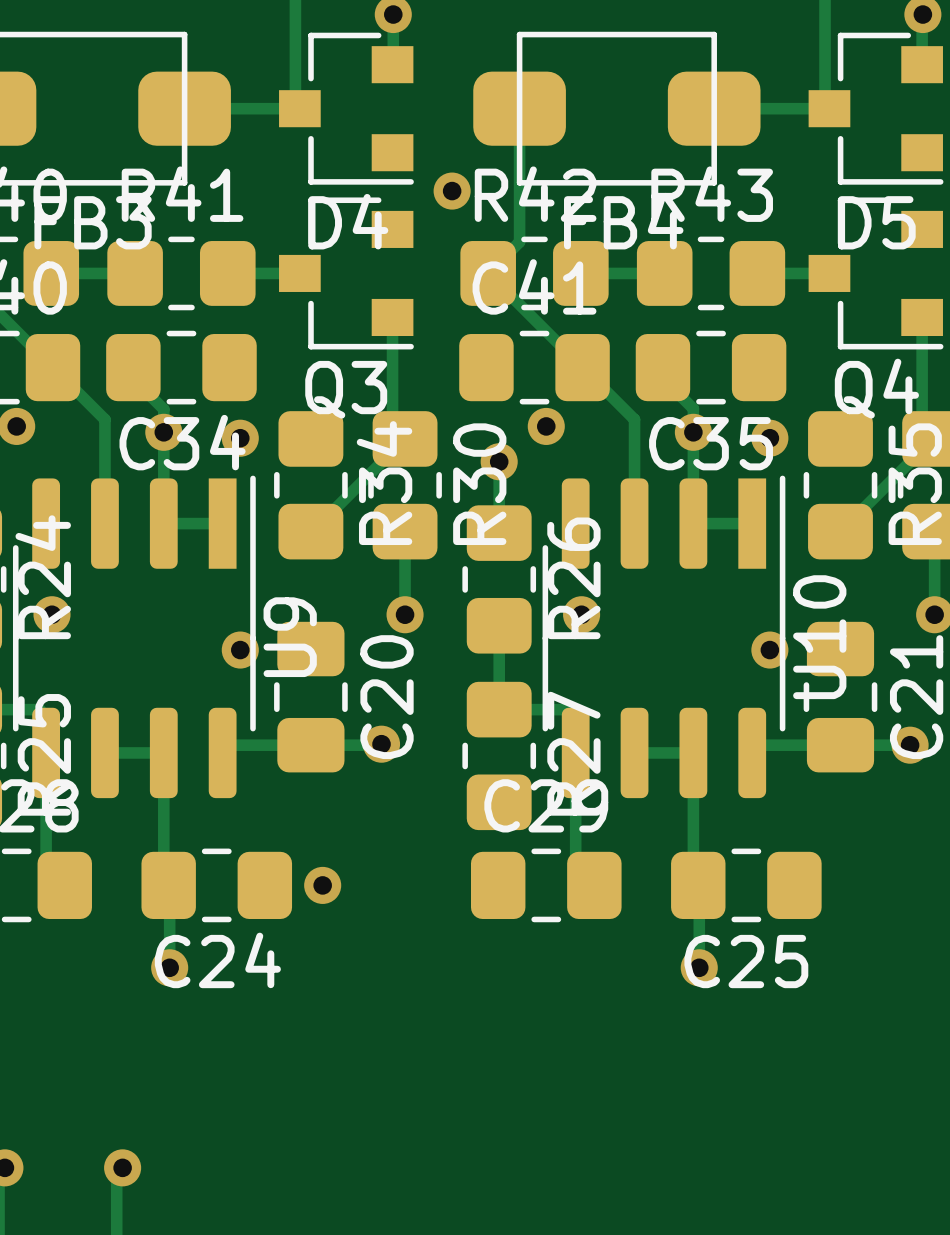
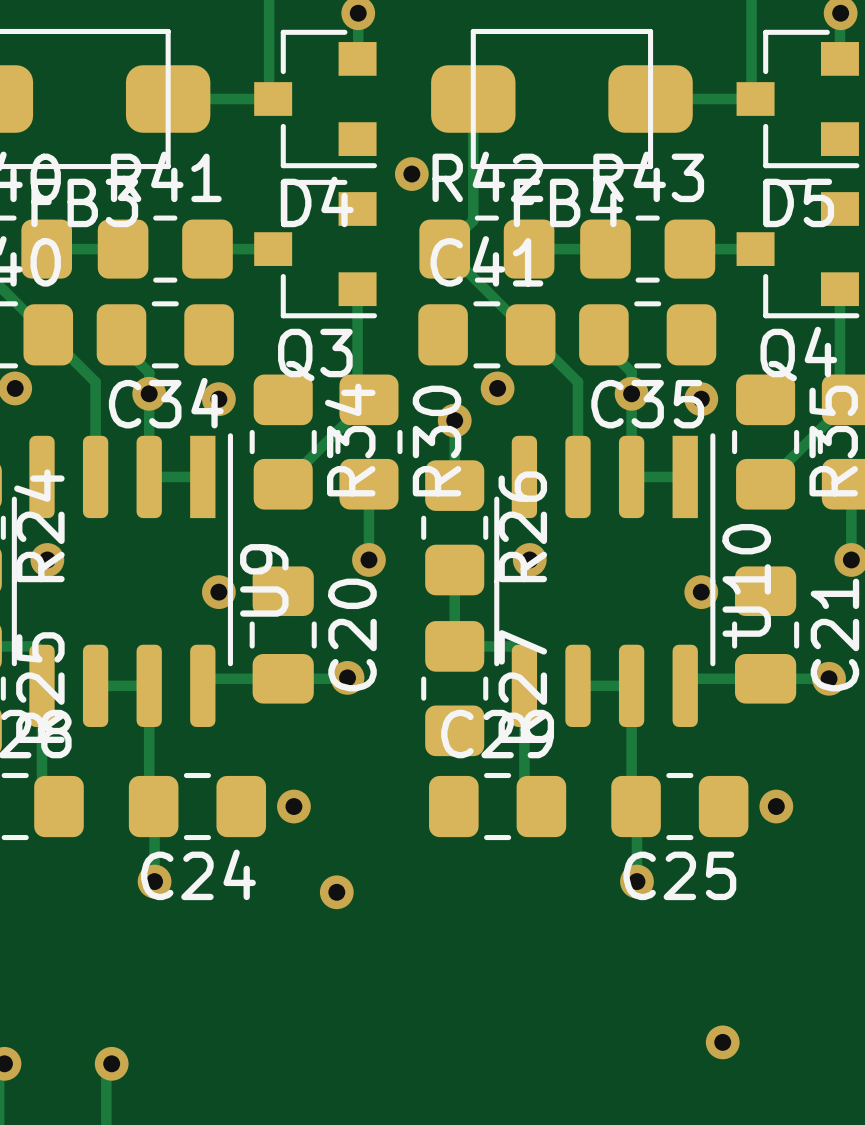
via: none -> (776, 806)
via: none -> (336, 892)
via: none -> (722, 1042)

